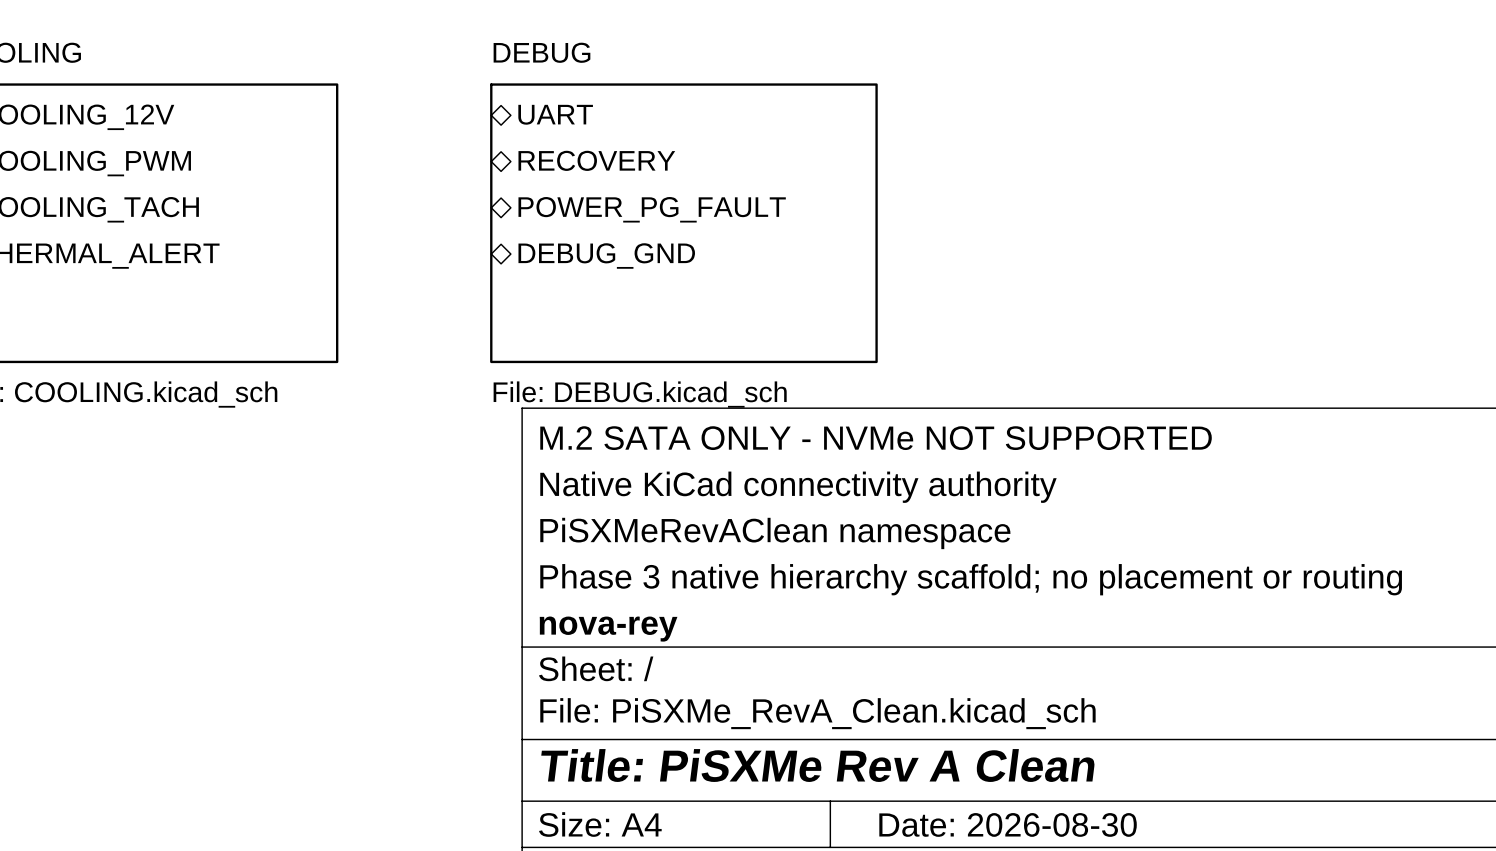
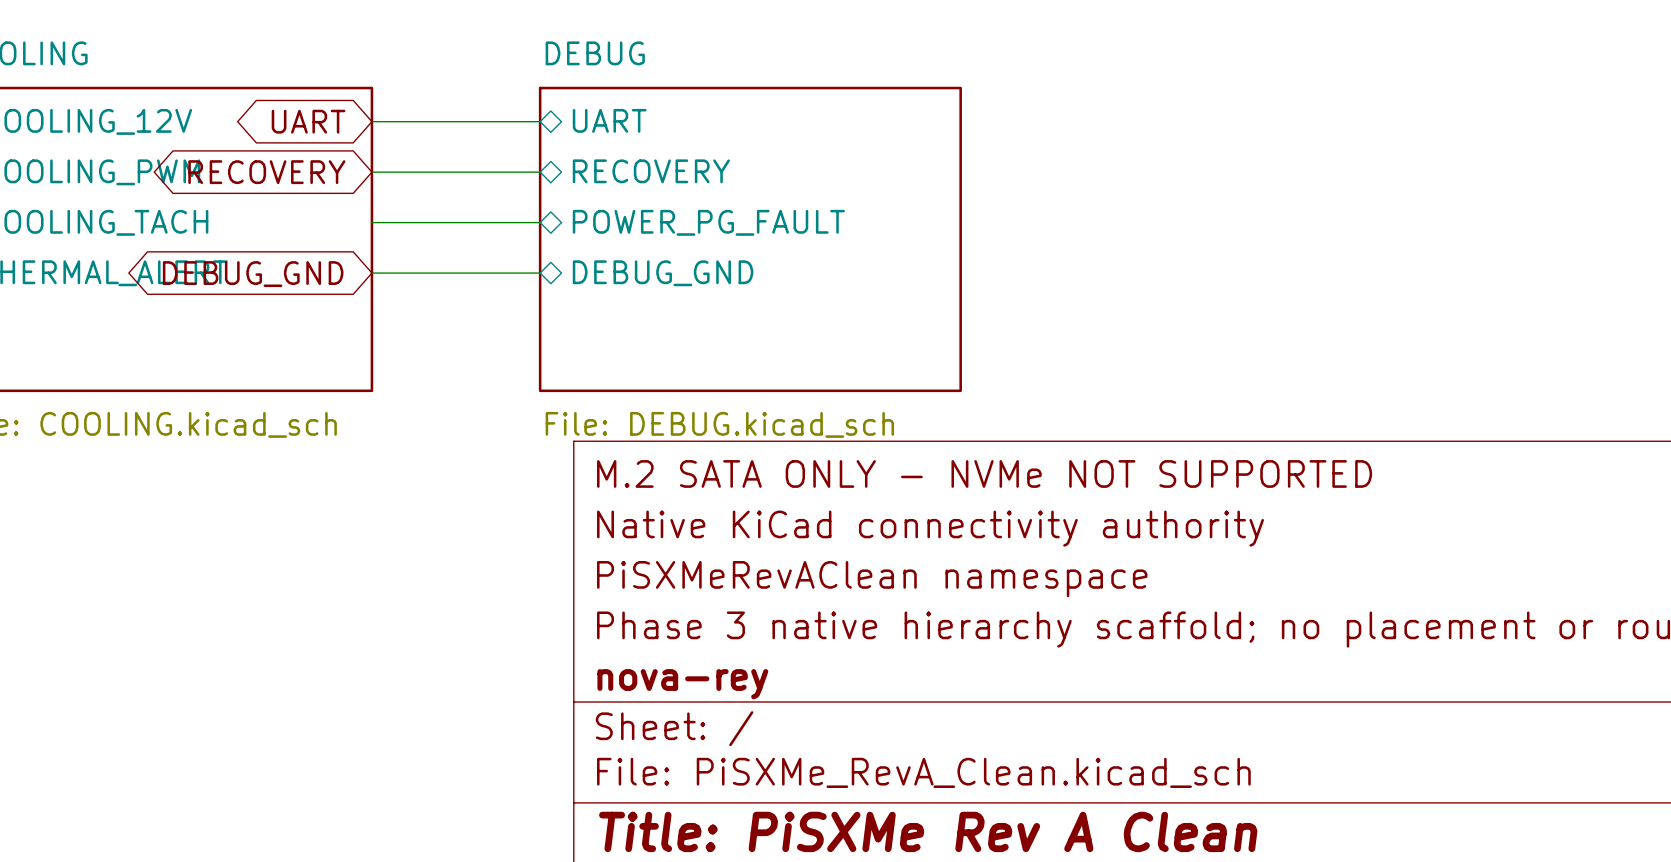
global label: none -> UART (308, 121)
wire: none -> (371, 121) (540, 121)
global label: none -> RECOVERY (266, 172)
wire: none -> (371, 172) (540, 172)
wire: none -> (371, 222) (540, 222)
wire: none -> (371, 273) (540, 273)
global label: none -> DEBUG_GND (253, 274)

